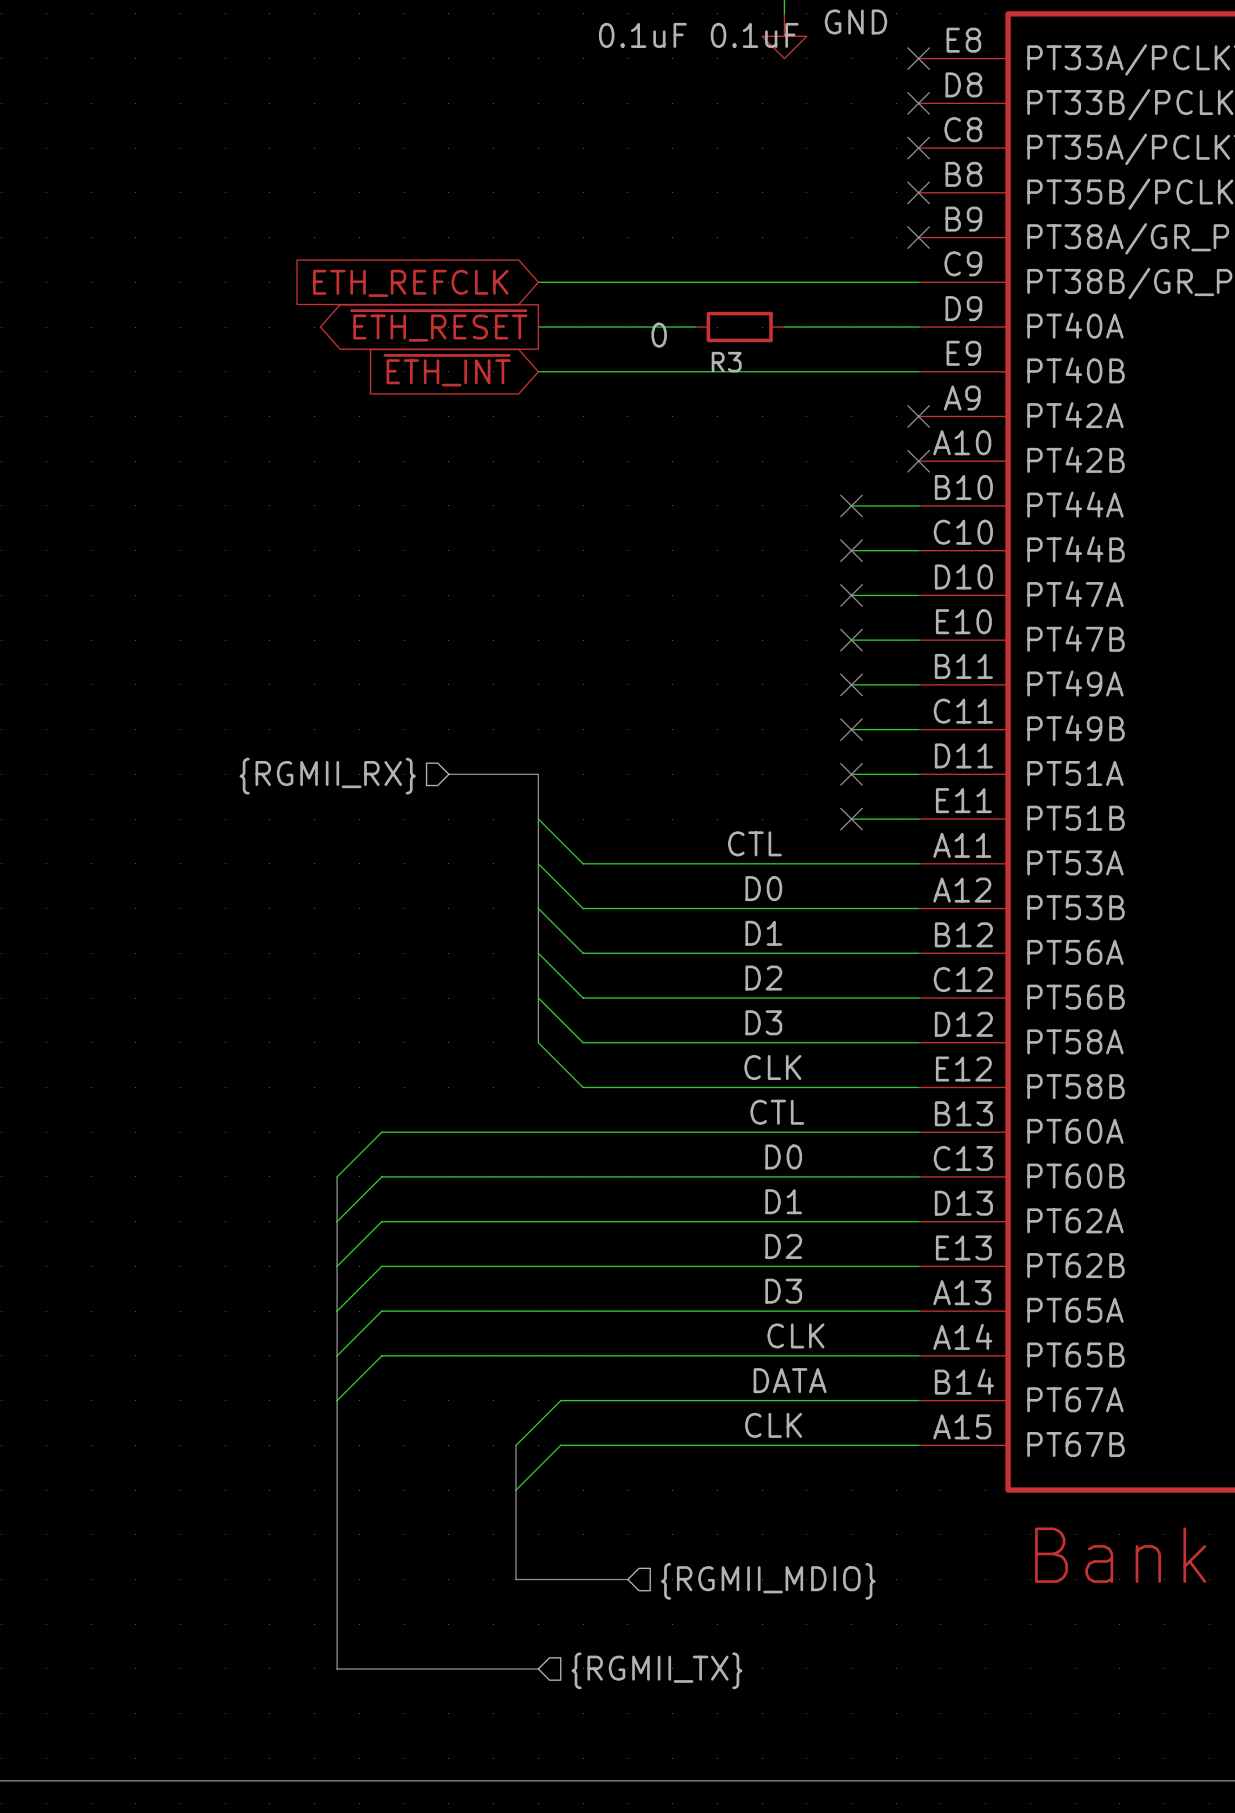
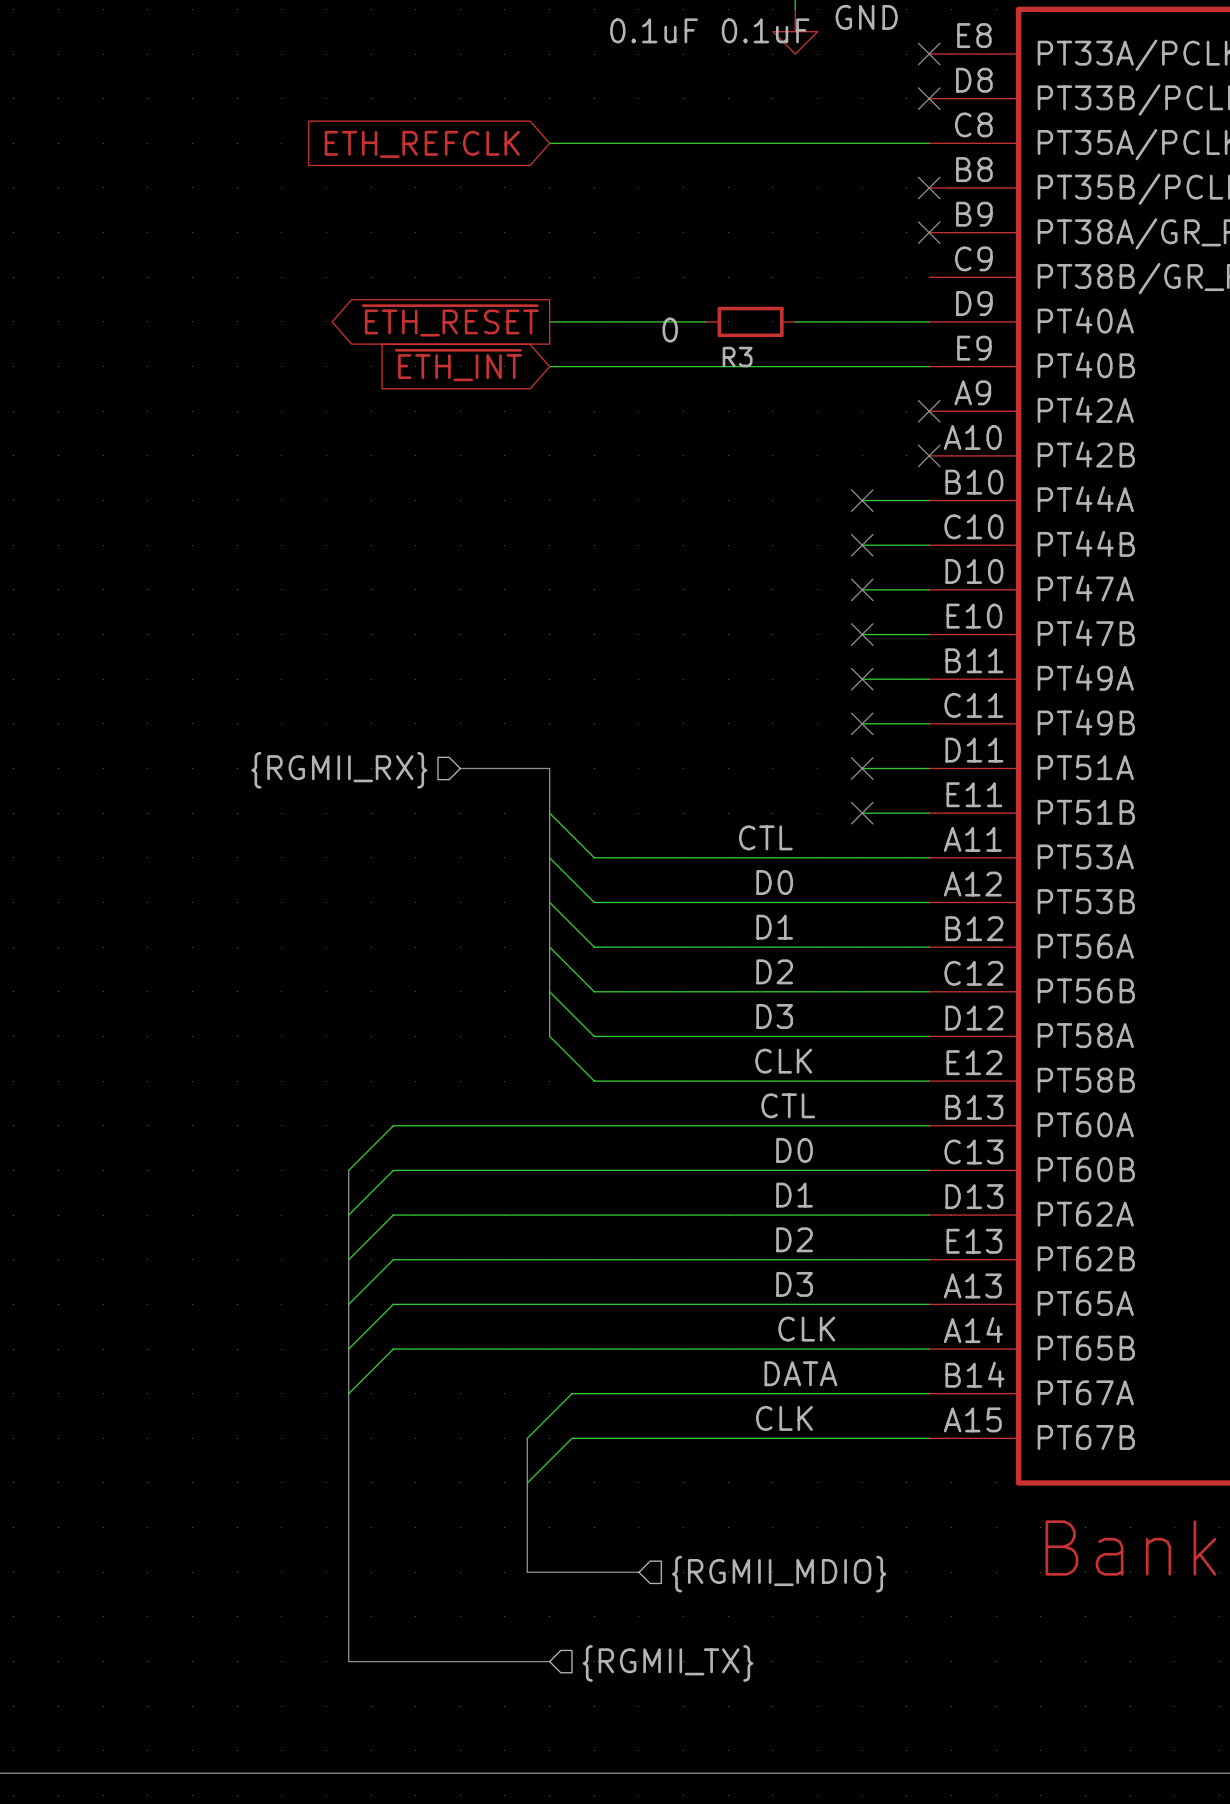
no-connect mark: (918, 148) -> none
wire: (538, 282) (918, 282) -> (549, 143) (929, 143)
global label position: ETH_REFCLK (410, 283) -> ETH_REFCLK (422, 144)

